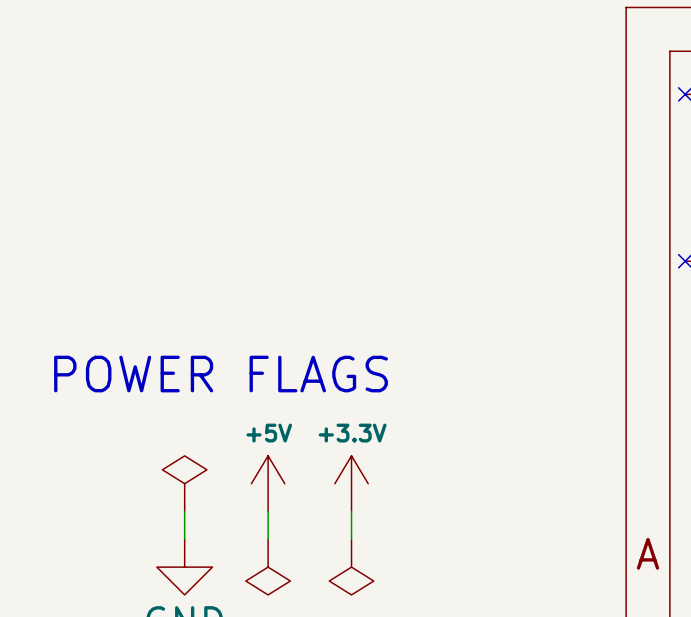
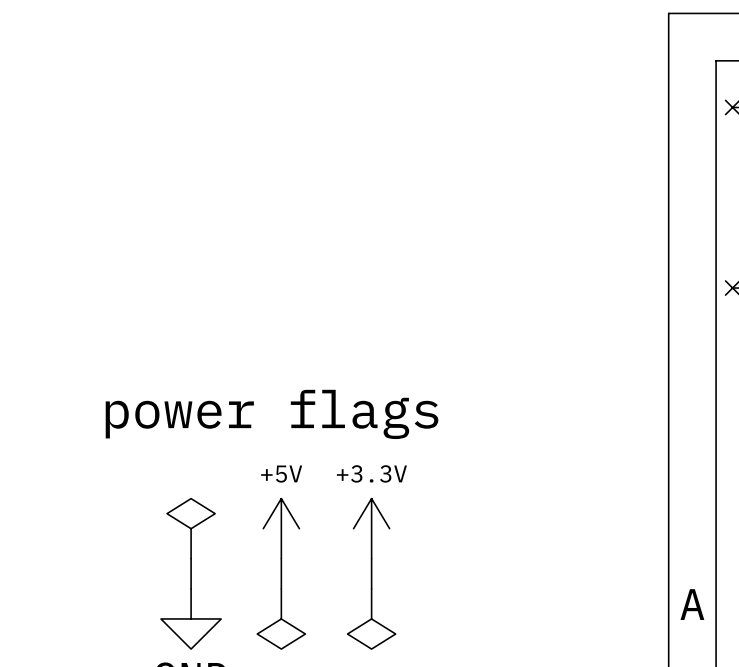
text: POWER FLAGS (221, 374) -> none
text: none -> power flags (272, 414)

